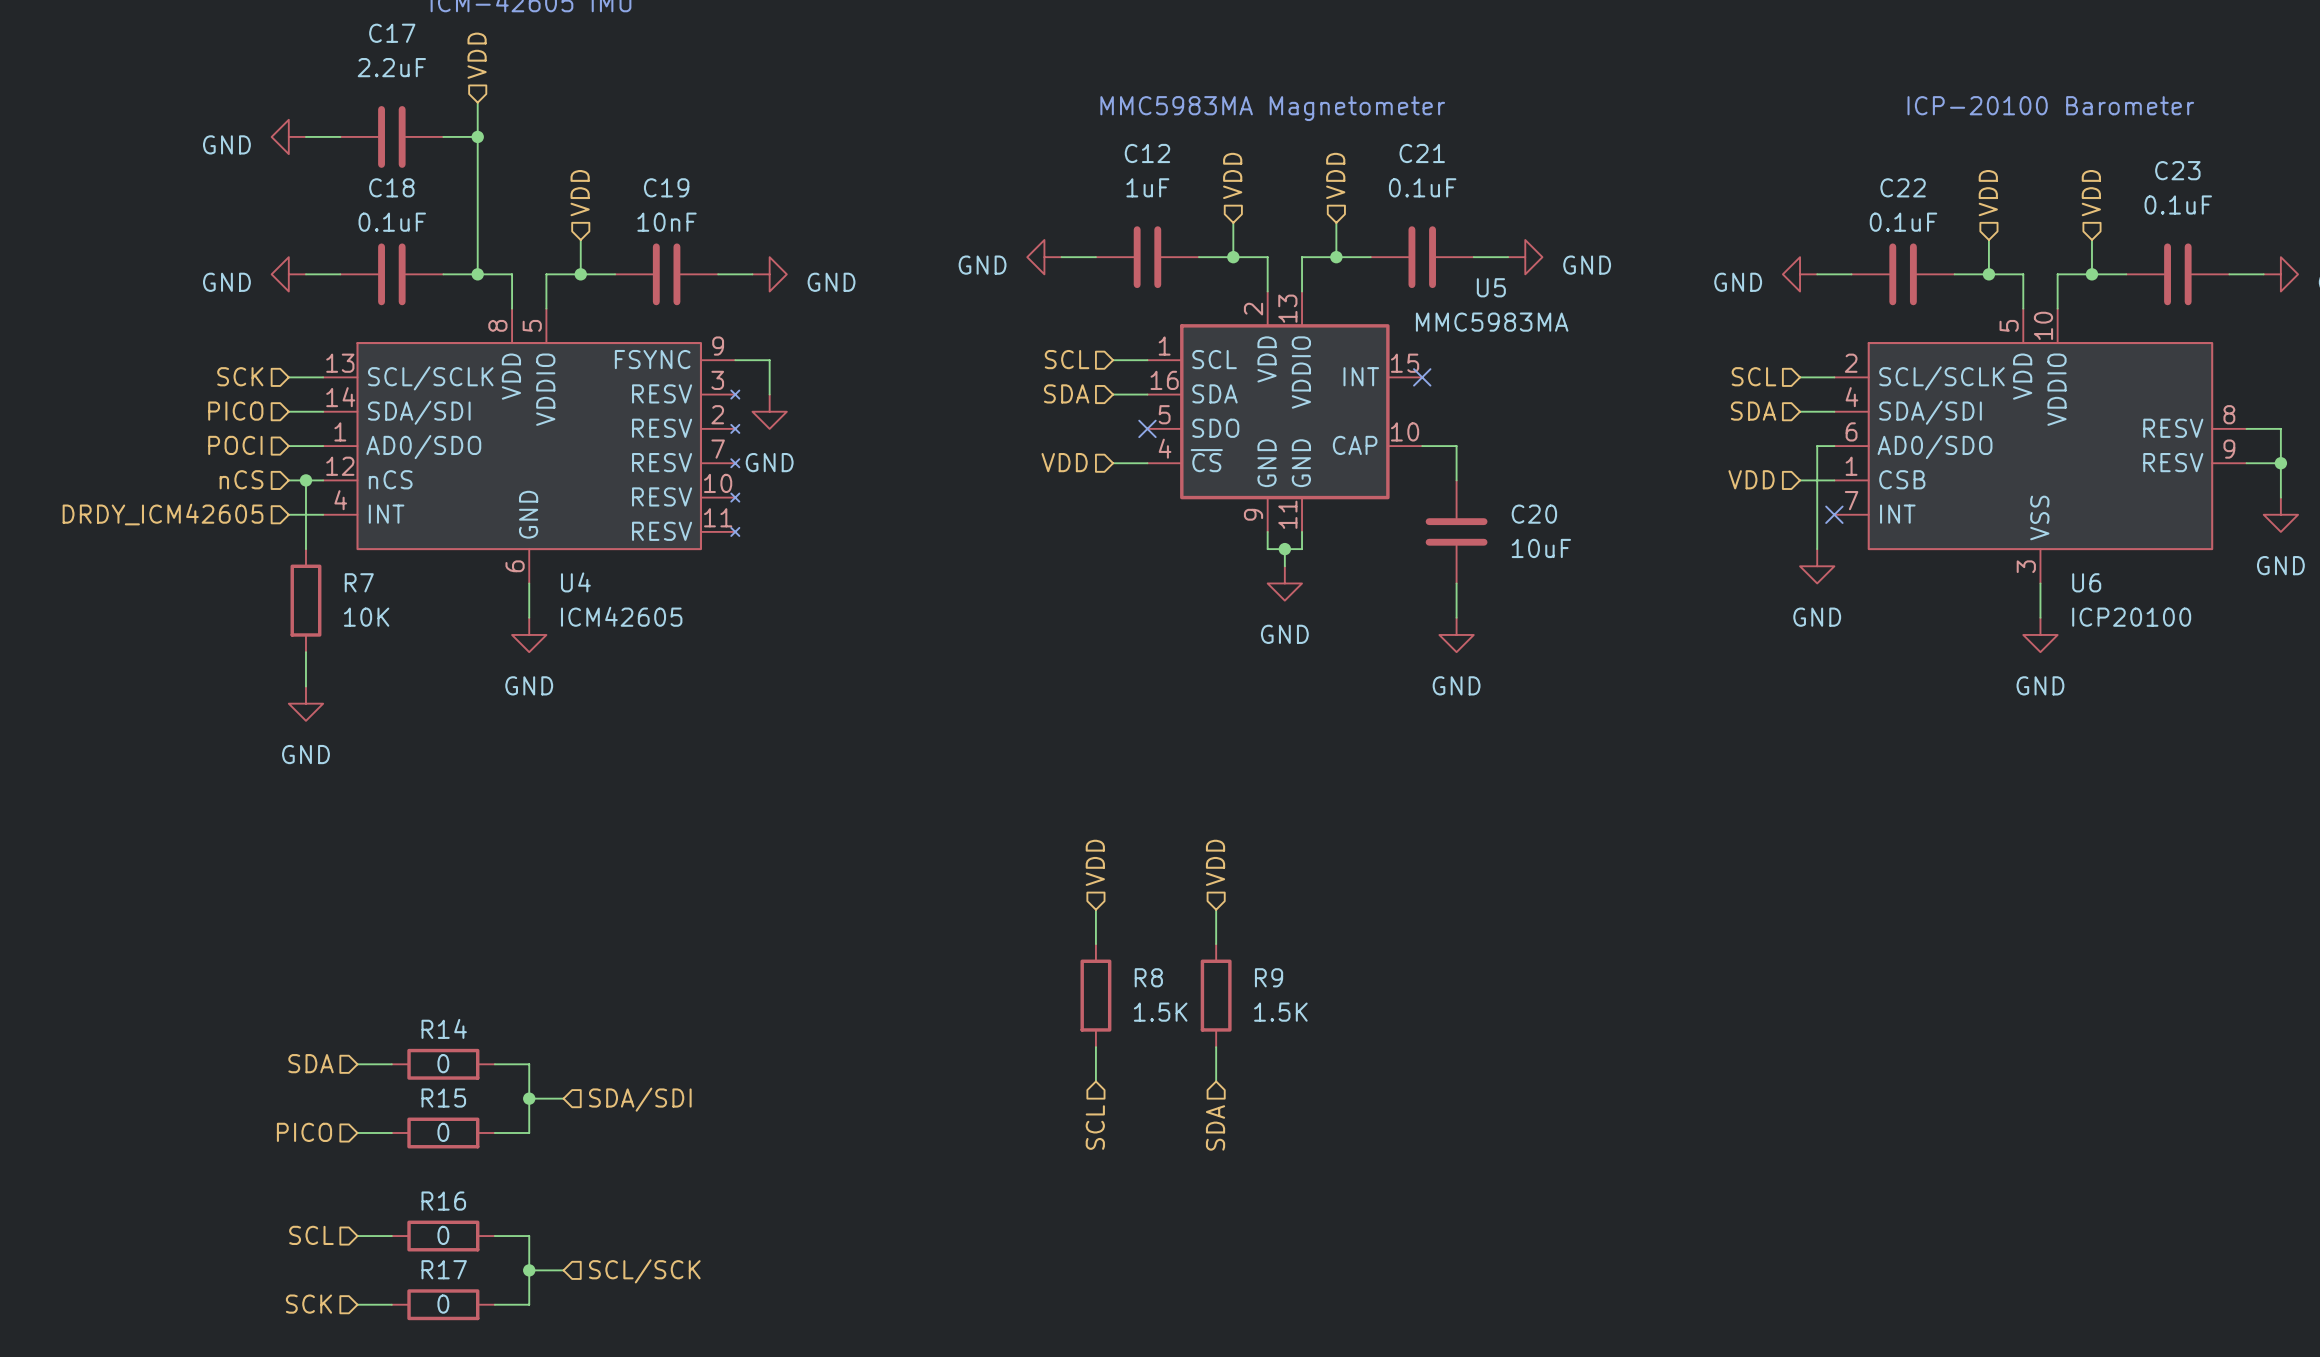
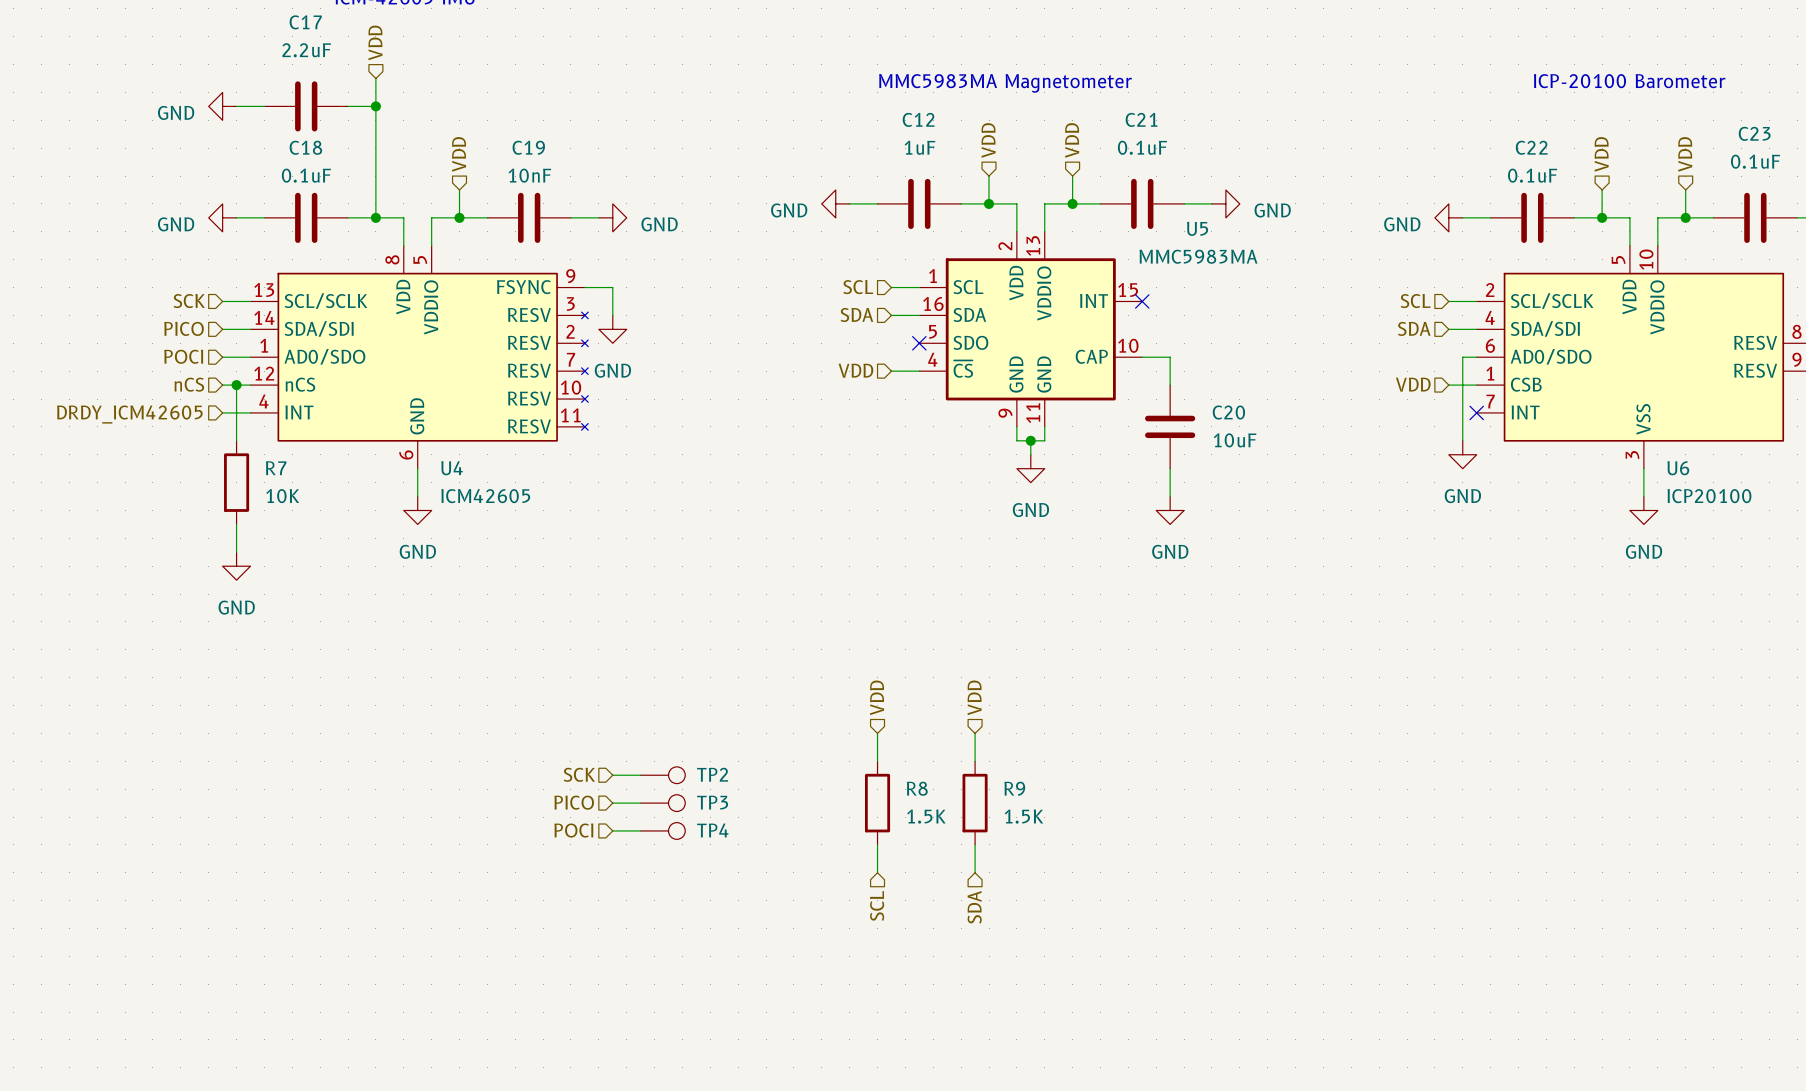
hierarchical label: none -> SCK (579, 774)
wire: none -> (612, 775) (640, 775)
TP2: none -> (662, 775)
hierarchical label: none -> PICO (574, 802)
wire: none -> (612, 803) (640, 803)
TP3: none -> (662, 803)
hierarchical label: none -> POCI (573, 830)
TP4: none -> (662, 830)
hierarchical label: SDA (311, 1063) -> none
wire: (357, 1064) (391, 1064) -> none
R14: 0 (443, 1064) -> none
wire: (494, 1064) (529, 1064) (529, 1132) (494, 1132) -> none
wire: (529, 1098) (563, 1098) -> (612, 830) (640, 830)
junction: (529, 1098) -> none
hierarchical label: SDA/SDI (640, 1099) -> none
hierarchical label: PICO (304, 1132) -> none
wire: (357, 1132) (391, 1132) -> none
R15: 0 (443, 1132) -> none
hierarchical label: SCL (311, 1235) -> none
wire: (357, 1236) (391, 1236) -> none
R16: 0 (443, 1236) -> none
wire: (494, 1236) (529, 1236) (529, 1304) (494, 1304) -> none
wire: (529, 1270) (563, 1270) -> none
junction: (529, 1270) -> none
hierarchical label: SCL/SCK (644, 1271) -> none
hierarchical label: SCK (308, 1304) -> none
wire: (357, 1304) (391, 1304) -> none
R17: 0 (443, 1304) -> none

